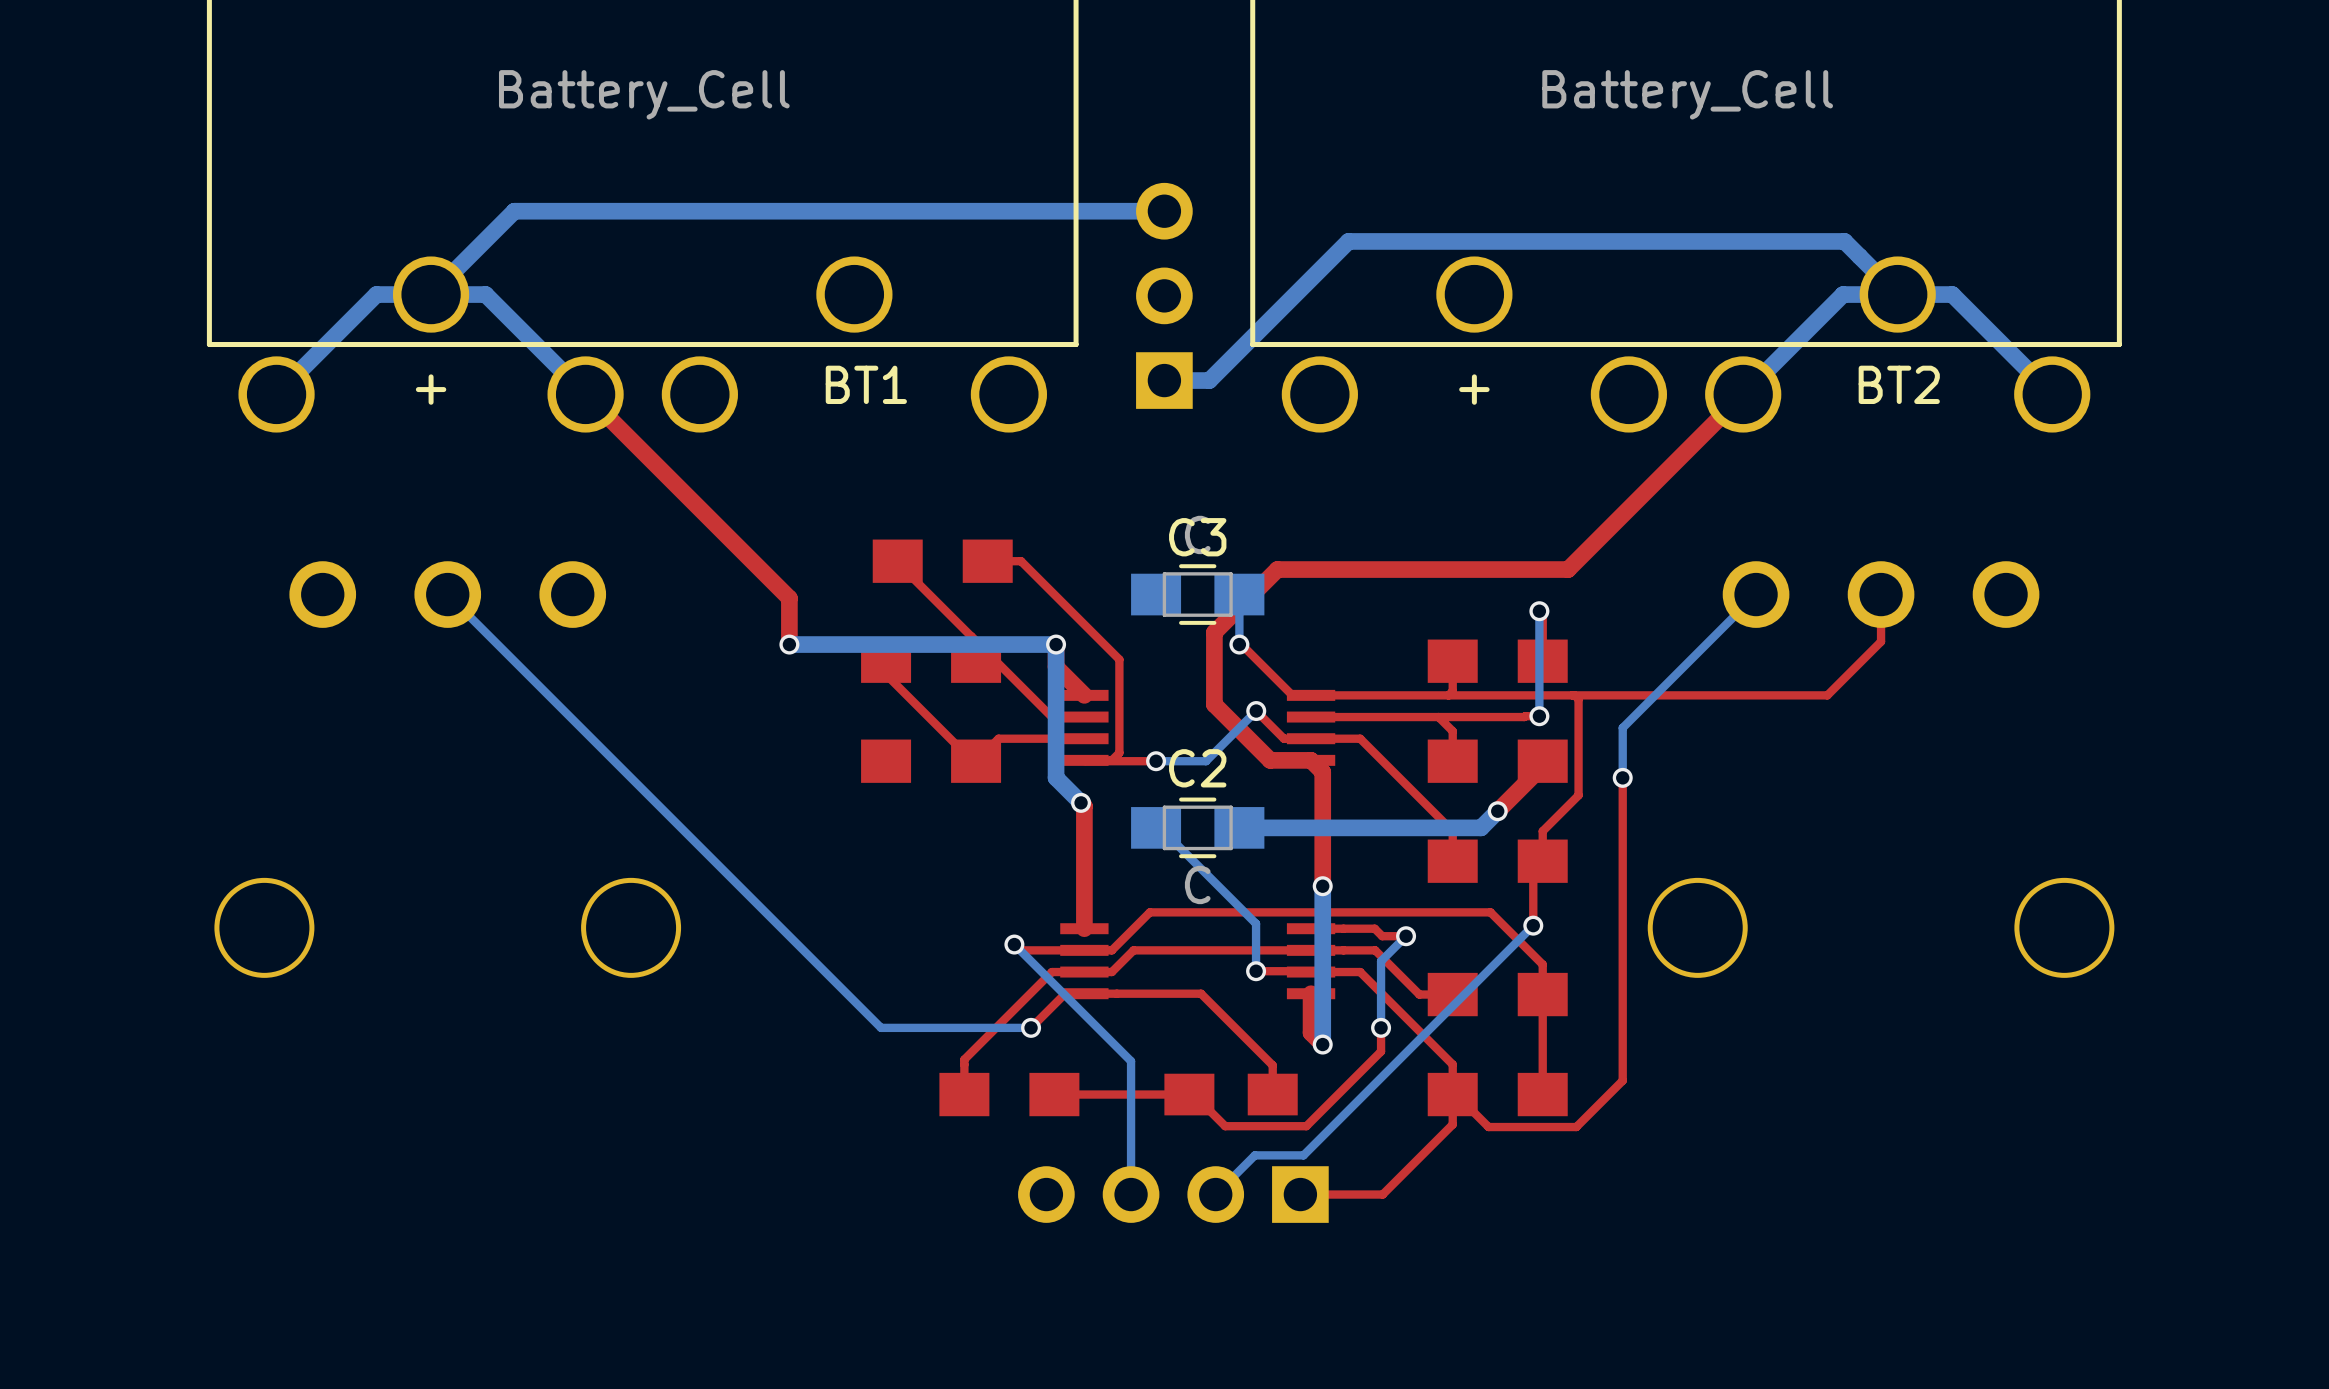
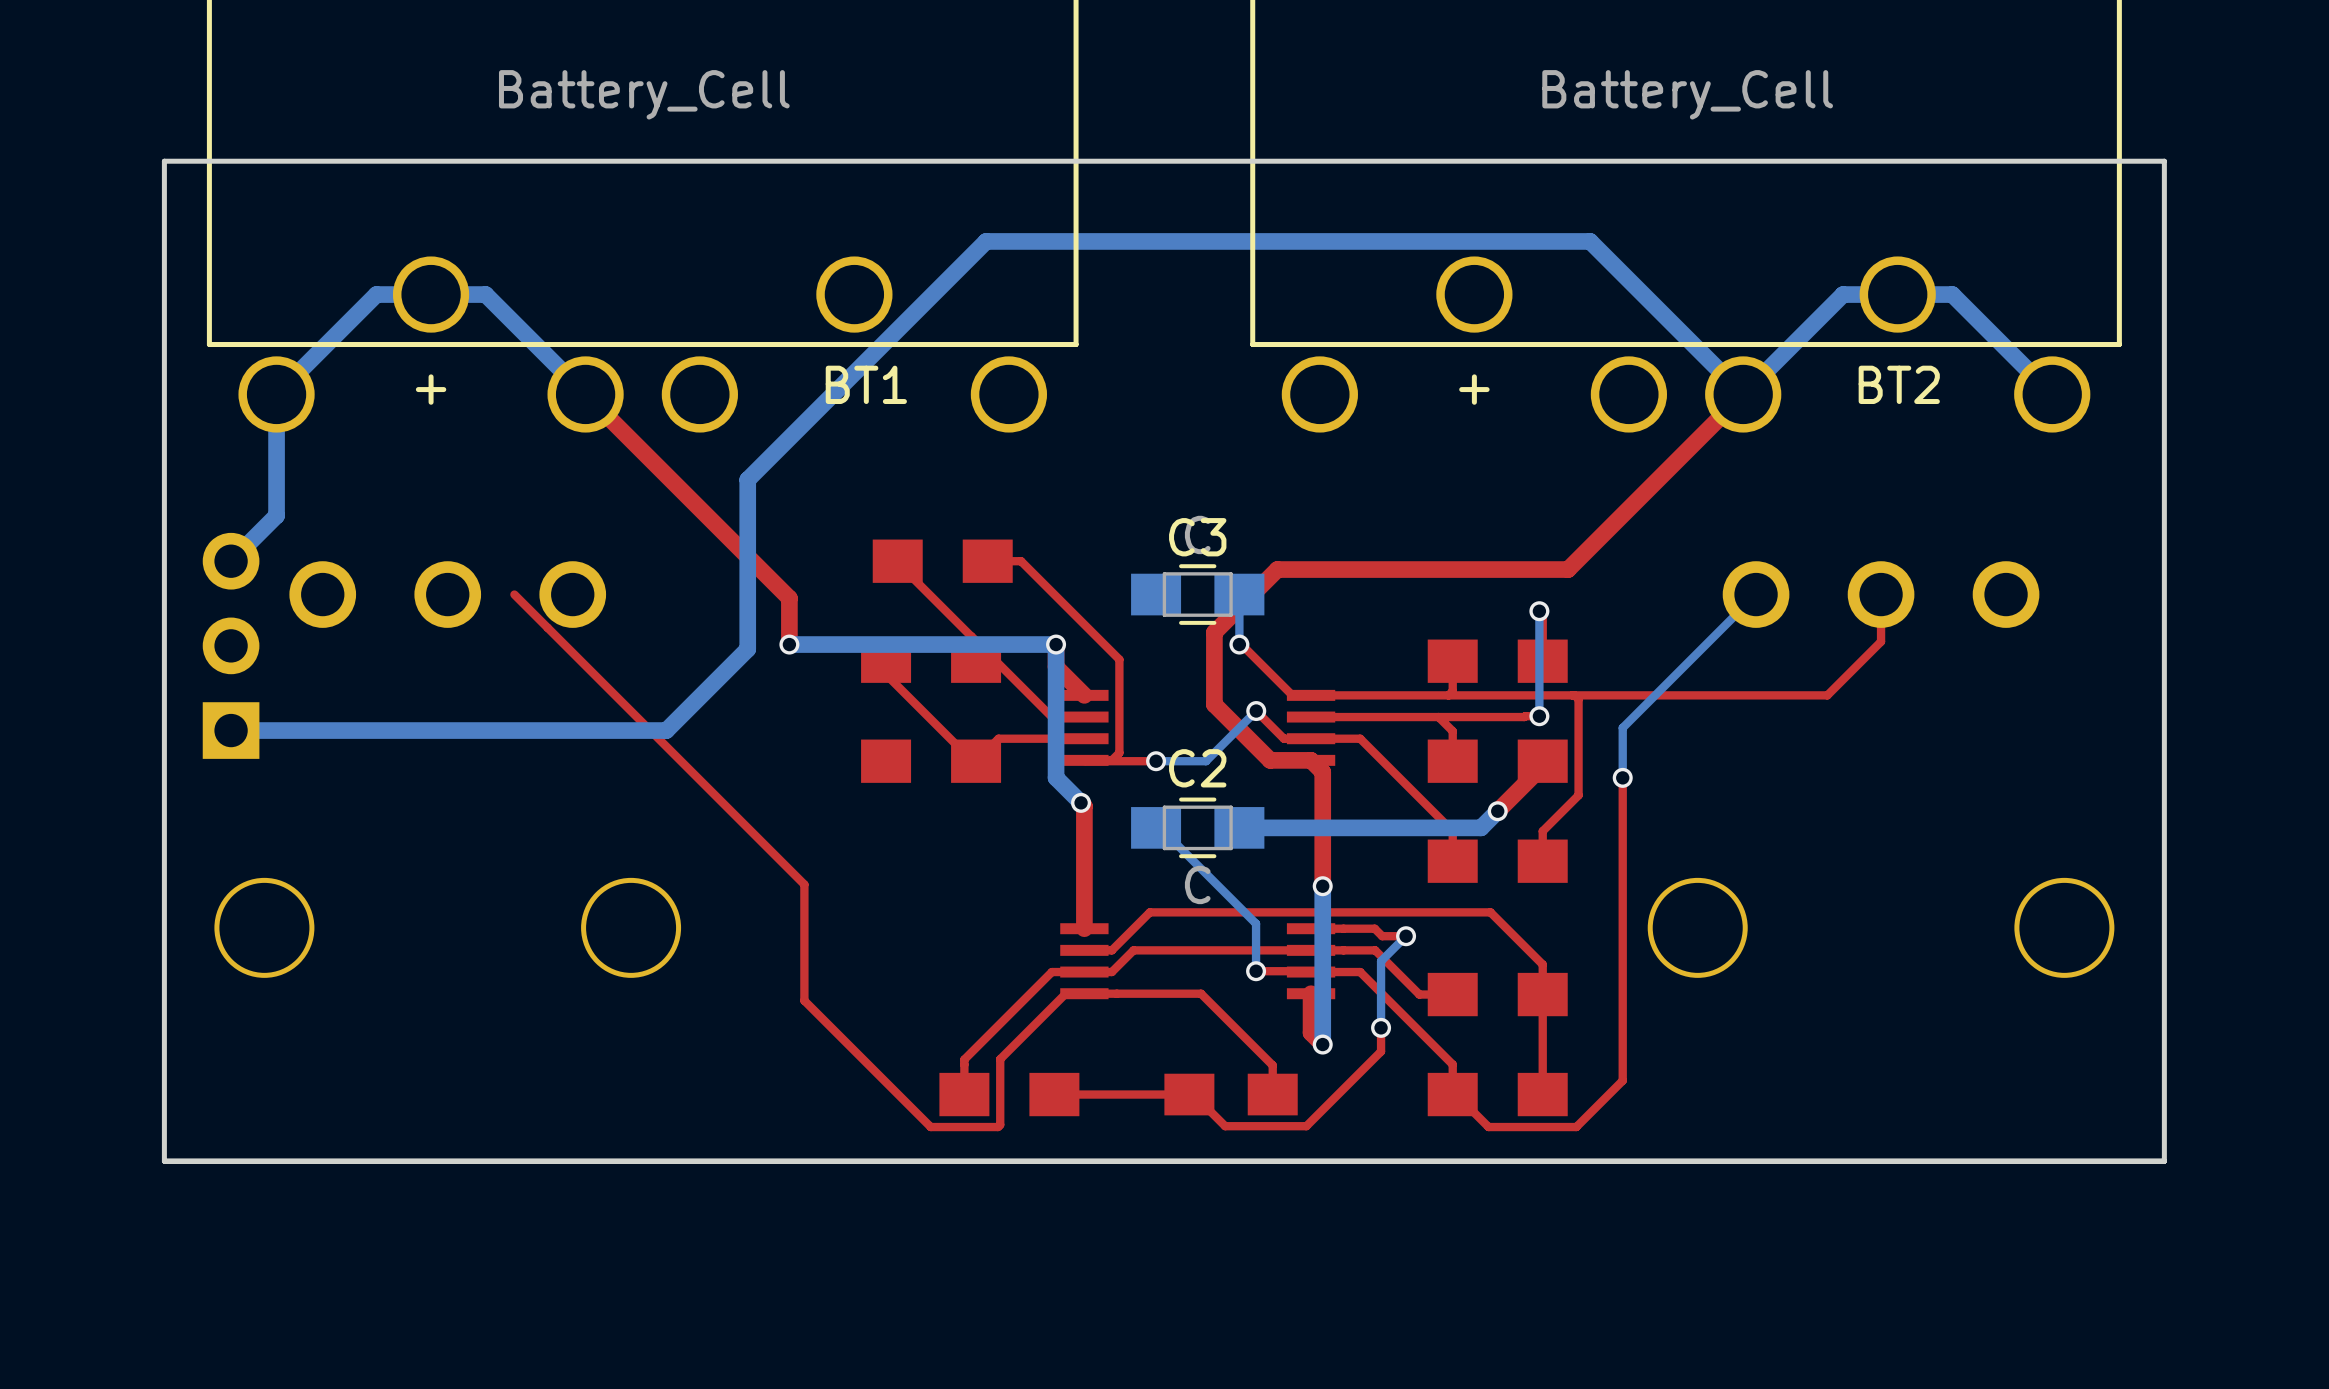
board edge: none -> (2164, 161) (164, 161) (164, 1161) (2164, 1161) (2164, 161)
bottom track: (1164, 211) (514, 211) (431, 294) -> none
bottom track: (1348, 241) (1209, 380) (1164, 380) -> (1348, 241) (986, 241) (747, 479) (747, 649) (666, 730) (231, 730)
bottom track: (1590, 241) (1844, 241) (1897, 294) -> (1590, 241) (1743, 394)
part: (1164, 295) -> none
bottom track: none -> (276, 394) (276, 515) (231, 561)
bottom track: (447, 594) (881, 1027) (1031, 1027) -> none
part: none -> (231, 645)
top track: (1542, 861) (1533, 870) (1533, 925) -> none
bottom track: (1533, 925) (1303, 1155) (1254, 1155) (1215, 1194) -> none
via: (1533, 925) -> none
bottom track: (1014, 944) (1131, 1061) (1131, 1194) -> none
top track: (1014, 944) (1020, 950) (1084, 950) -> none
via: (1014, 944) -> none
top track: (1065, 993) (1031, 1027) -> (1065, 993) (1000, 1059) (1000, 1124) (998, 1127) (930, 1127) (804, 1000) (804, 884) (514, 594)
via: (1031, 1027) -> none
top track: (1452, 1094) (1452, 1124) (1382, 1194) (1300, 1194) -> none
part: (1173, 1194) -> none

